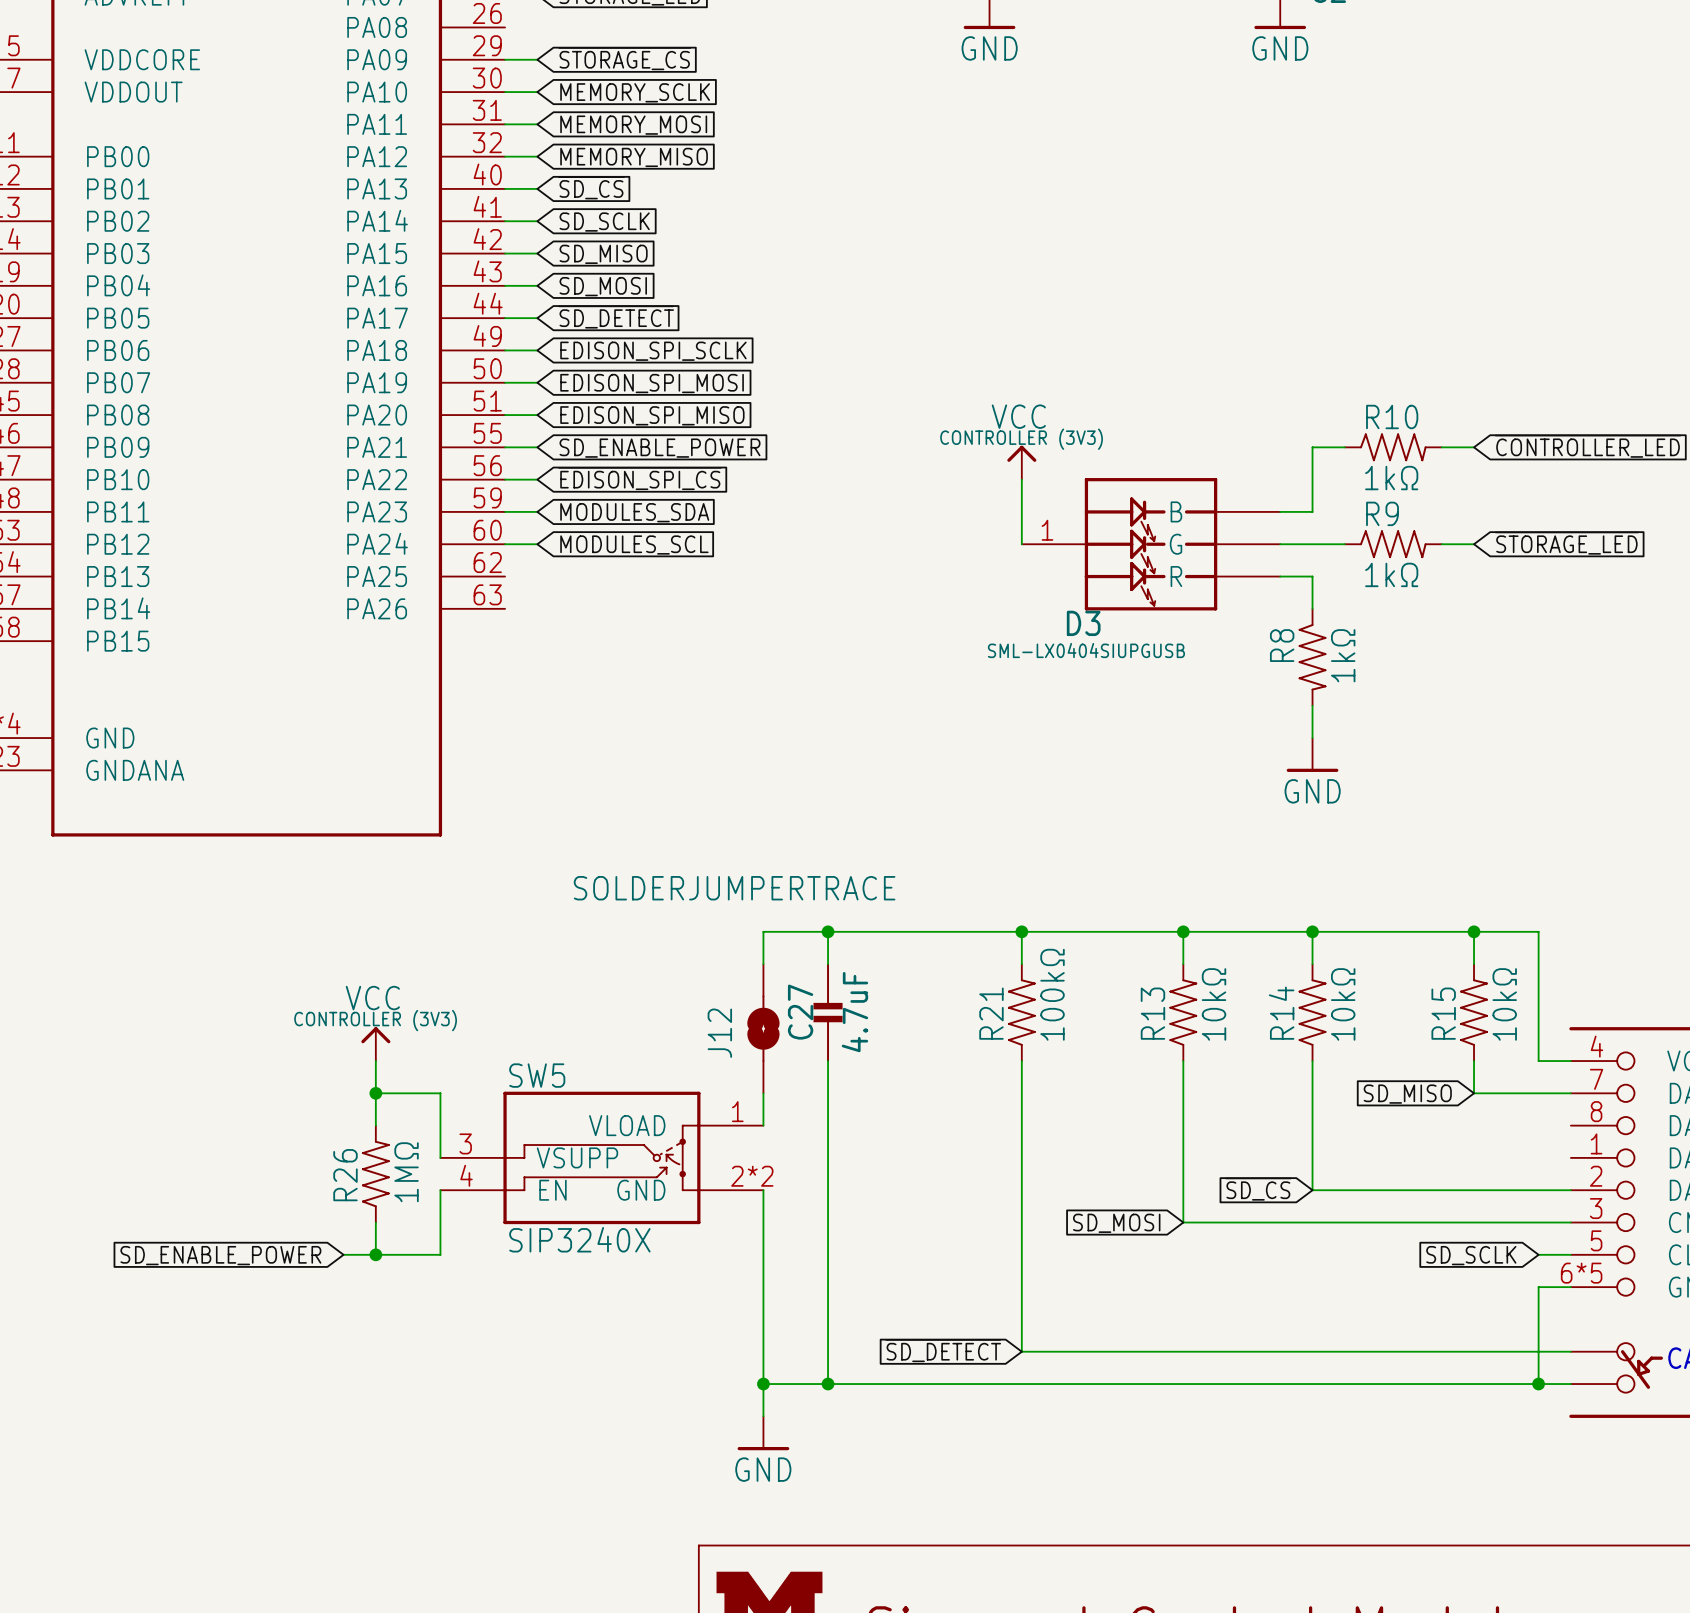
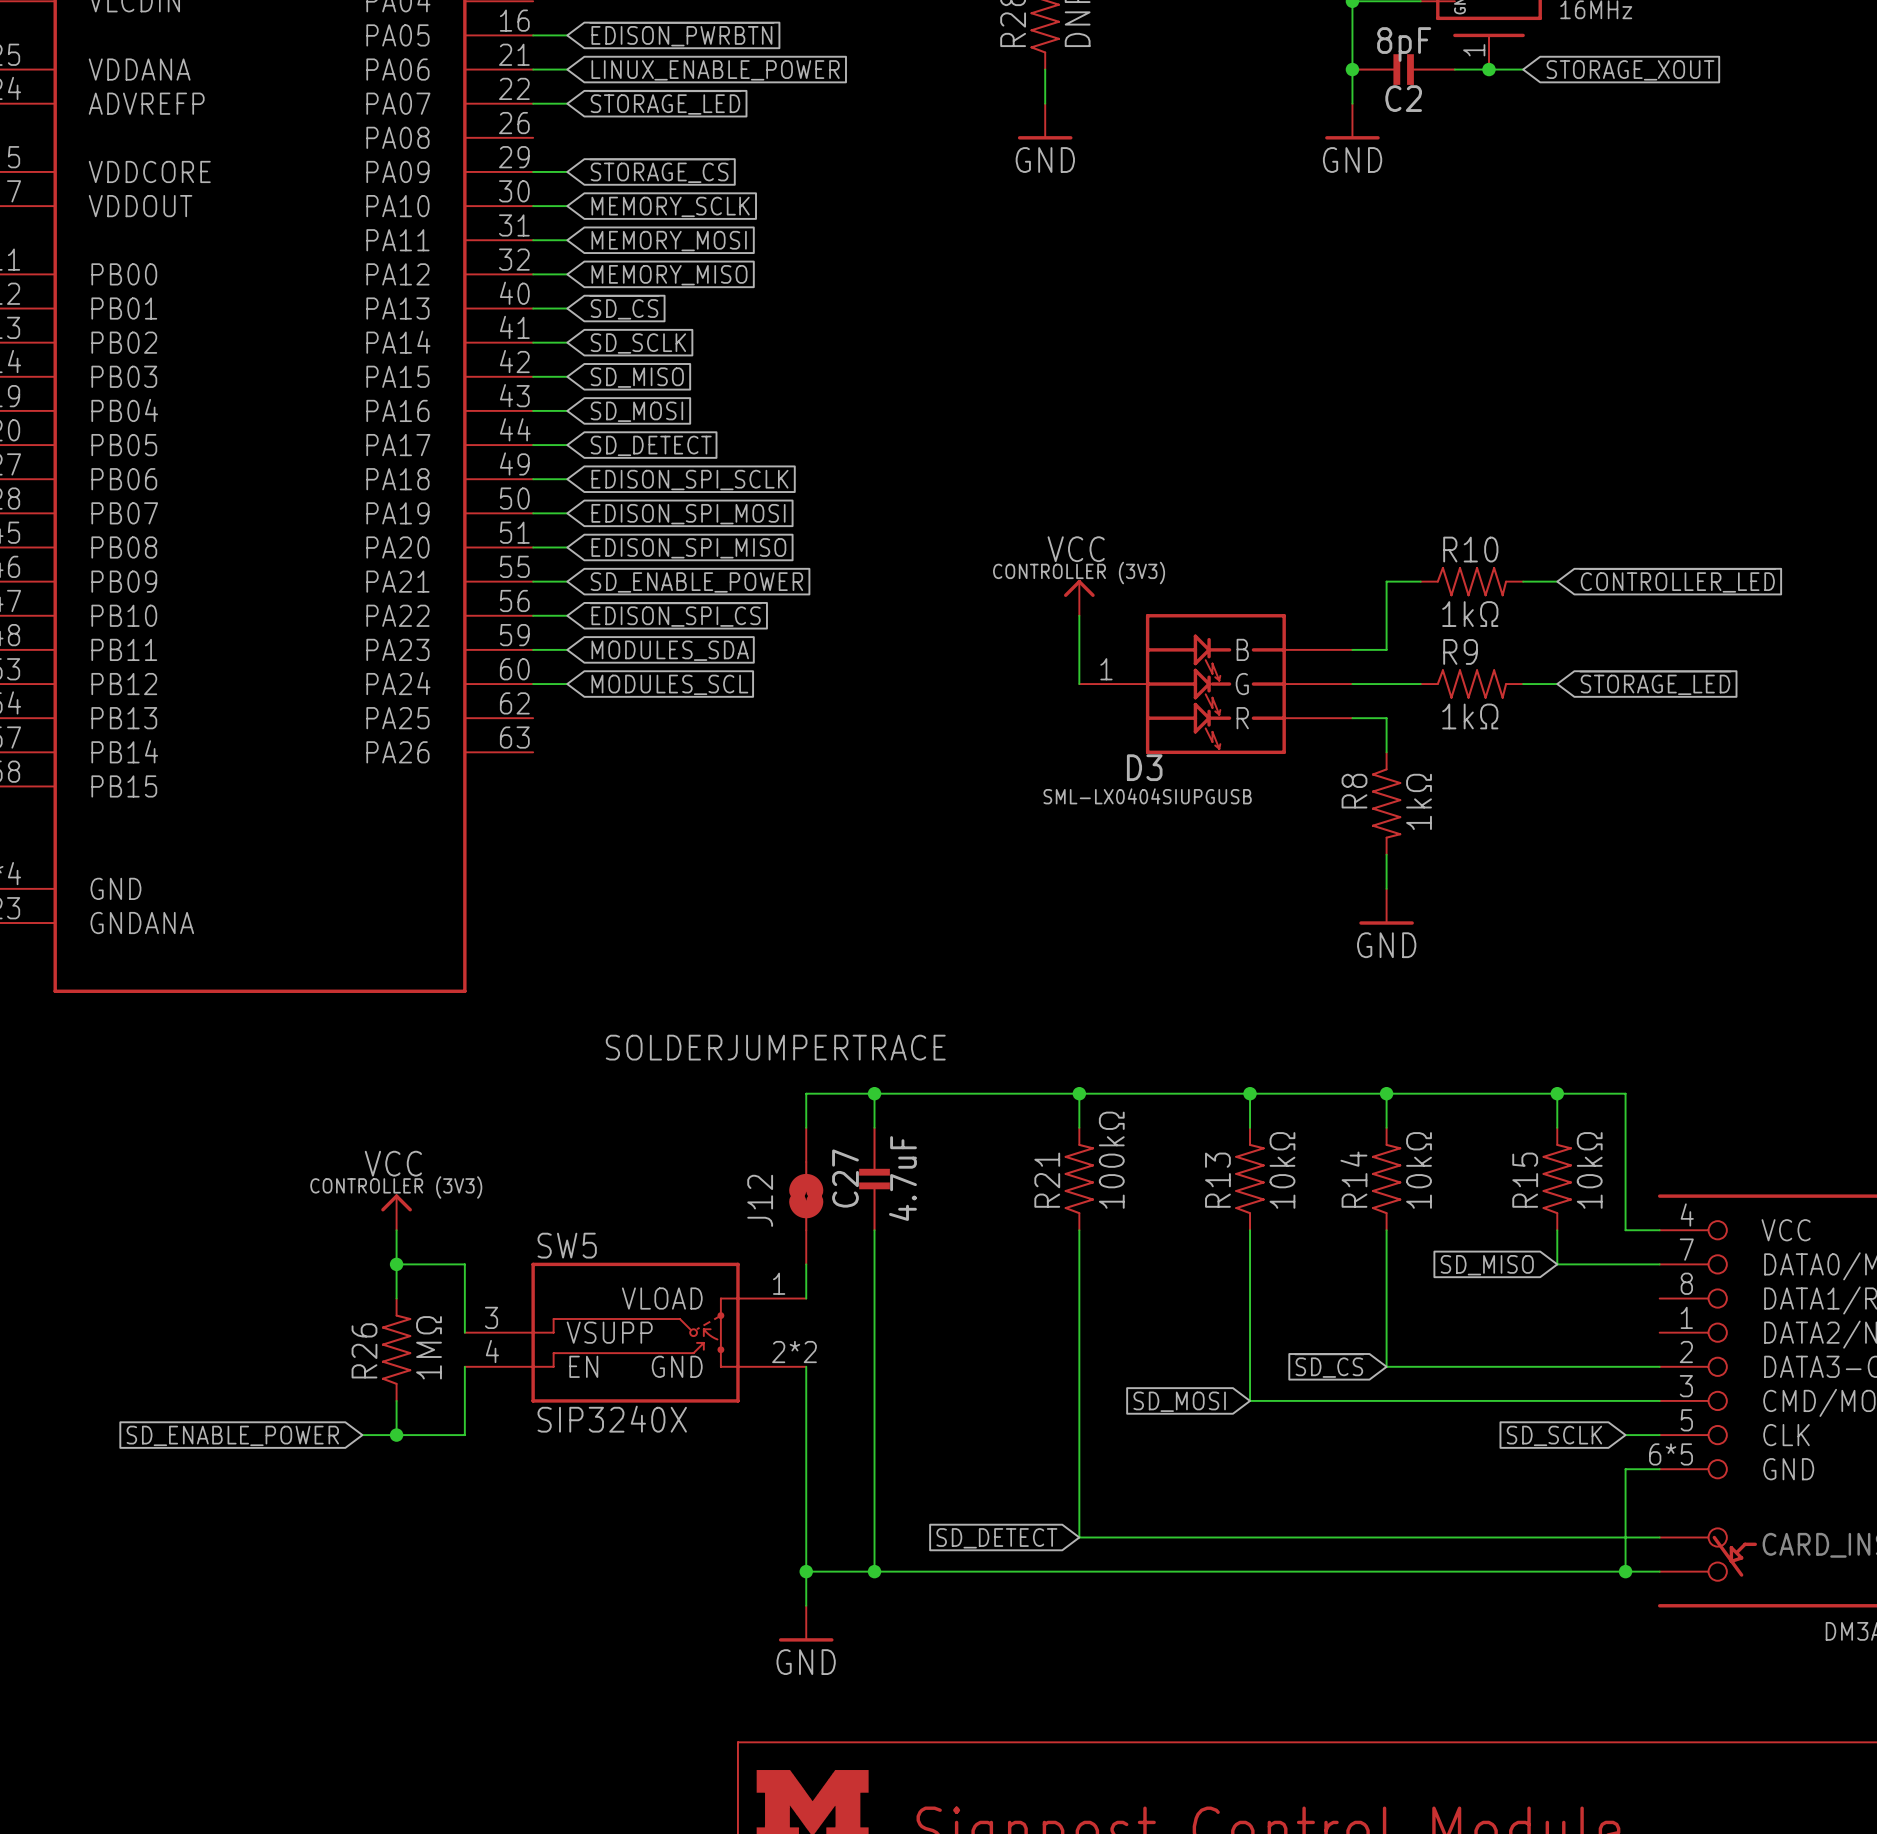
global label: ~{SD_DETECT} (616, 317) -> SD_DETECT (651, 445)
global label: ~{SD_DETECT} (943, 1350) -> SD_DETECT (996, 1538)

